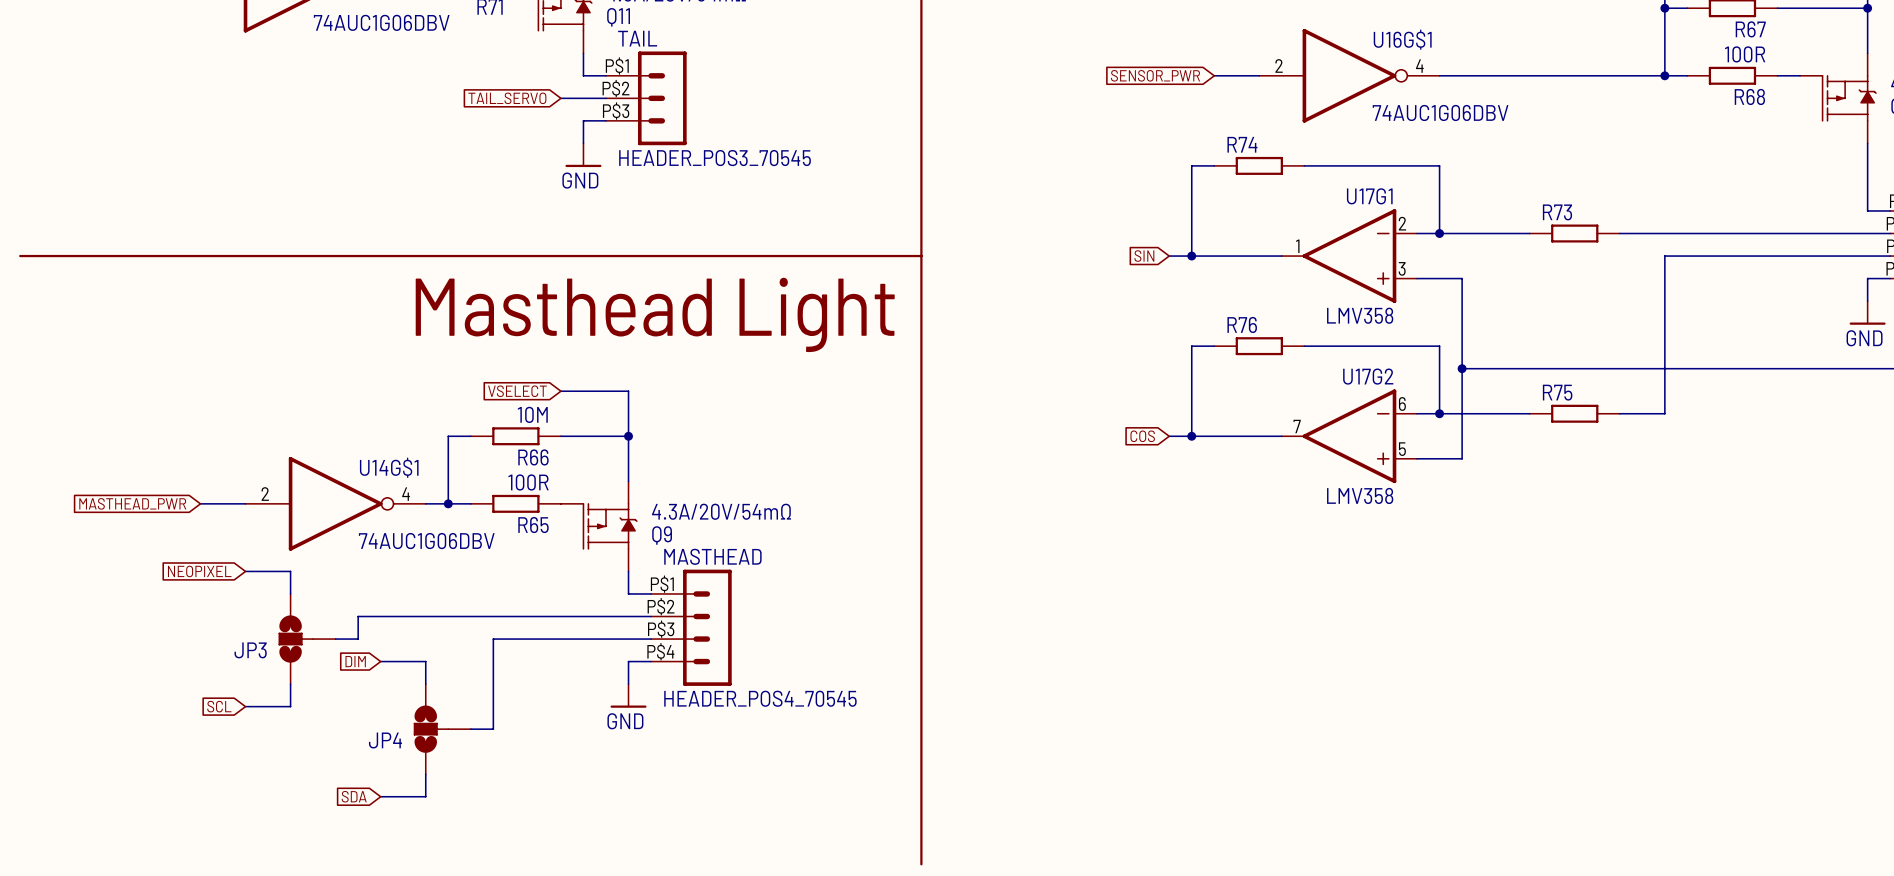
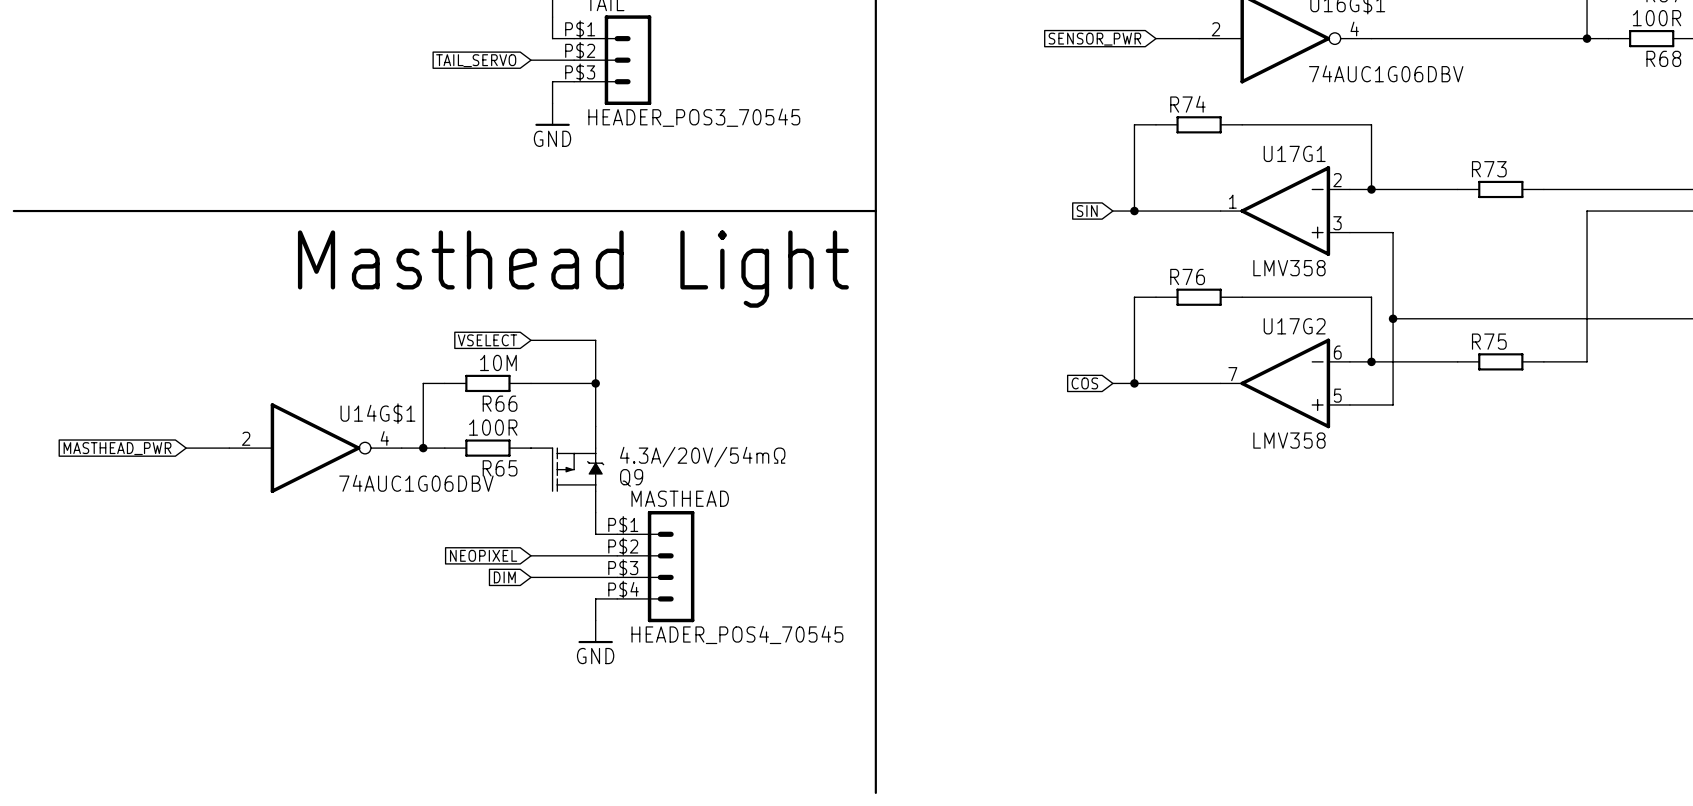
global label: NEOPIXEL (199, 571) -> none
wire: (245, 571) (290, 571) (290, 593) -> none
global label: none -> NEOPIXEL (483, 555)
wire: (560, 616) (358, 616) (358, 639) (335, 639) -> none
JP3: (307, 639) -> none
wire: (560, 639) (493, 639) (493, 729) (470, 729) -> none
global label position: DIM (355, 661) -> DIM (504, 577)
wire: (380, 661) (425, 661) (425, 684) -> none
wire: (290, 684) (290, 706) (245, 706) -> none
global label: SCL (219, 706) -> none
JP4: (442, 729) -> none
wire: (425, 774) (425, 796) (380, 796) -> none
global label: SDA (354, 796) -> none

